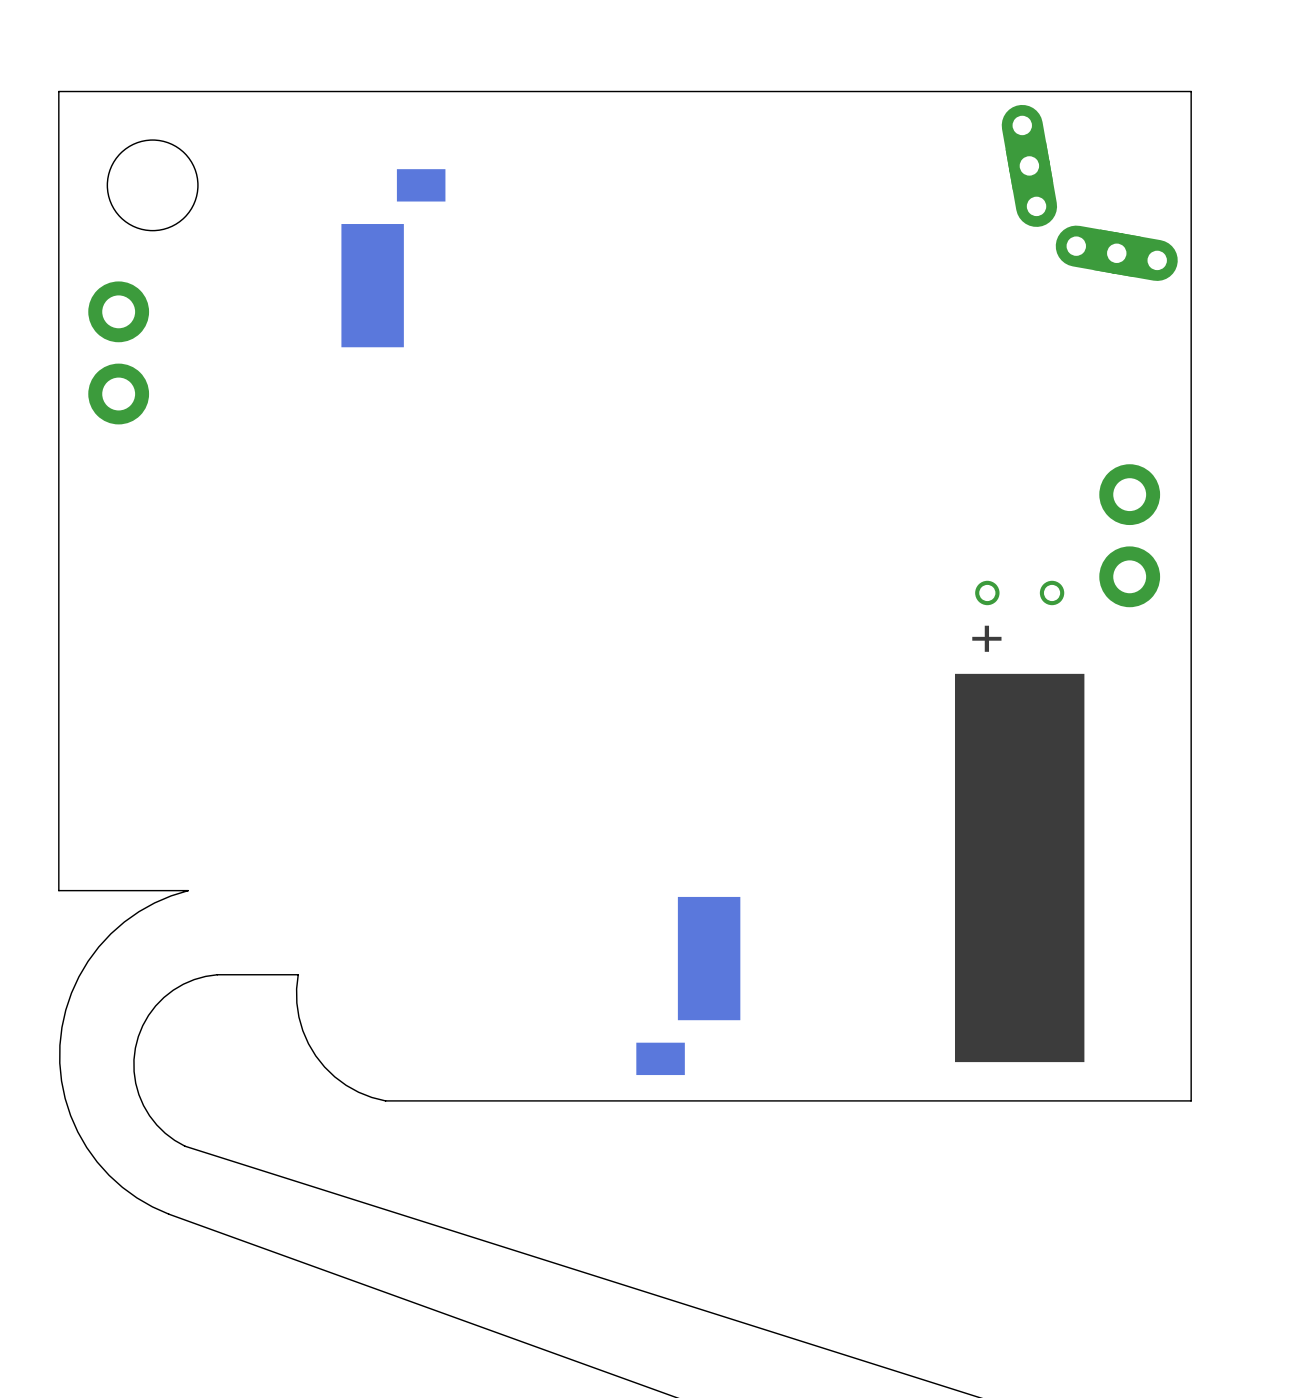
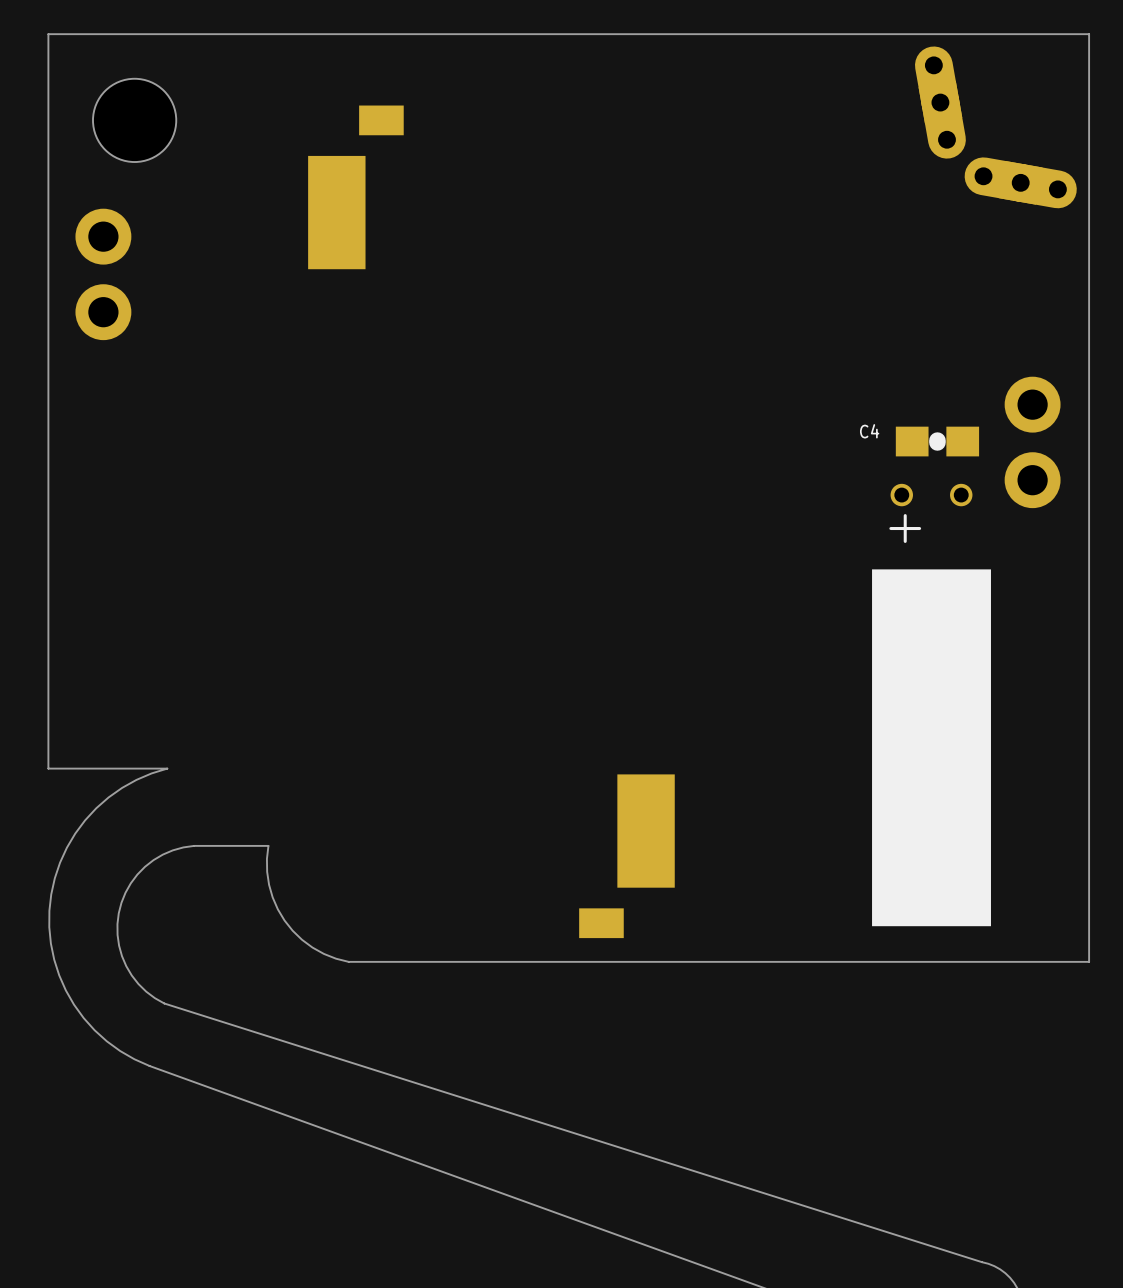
C4: none -> (937, 441)

